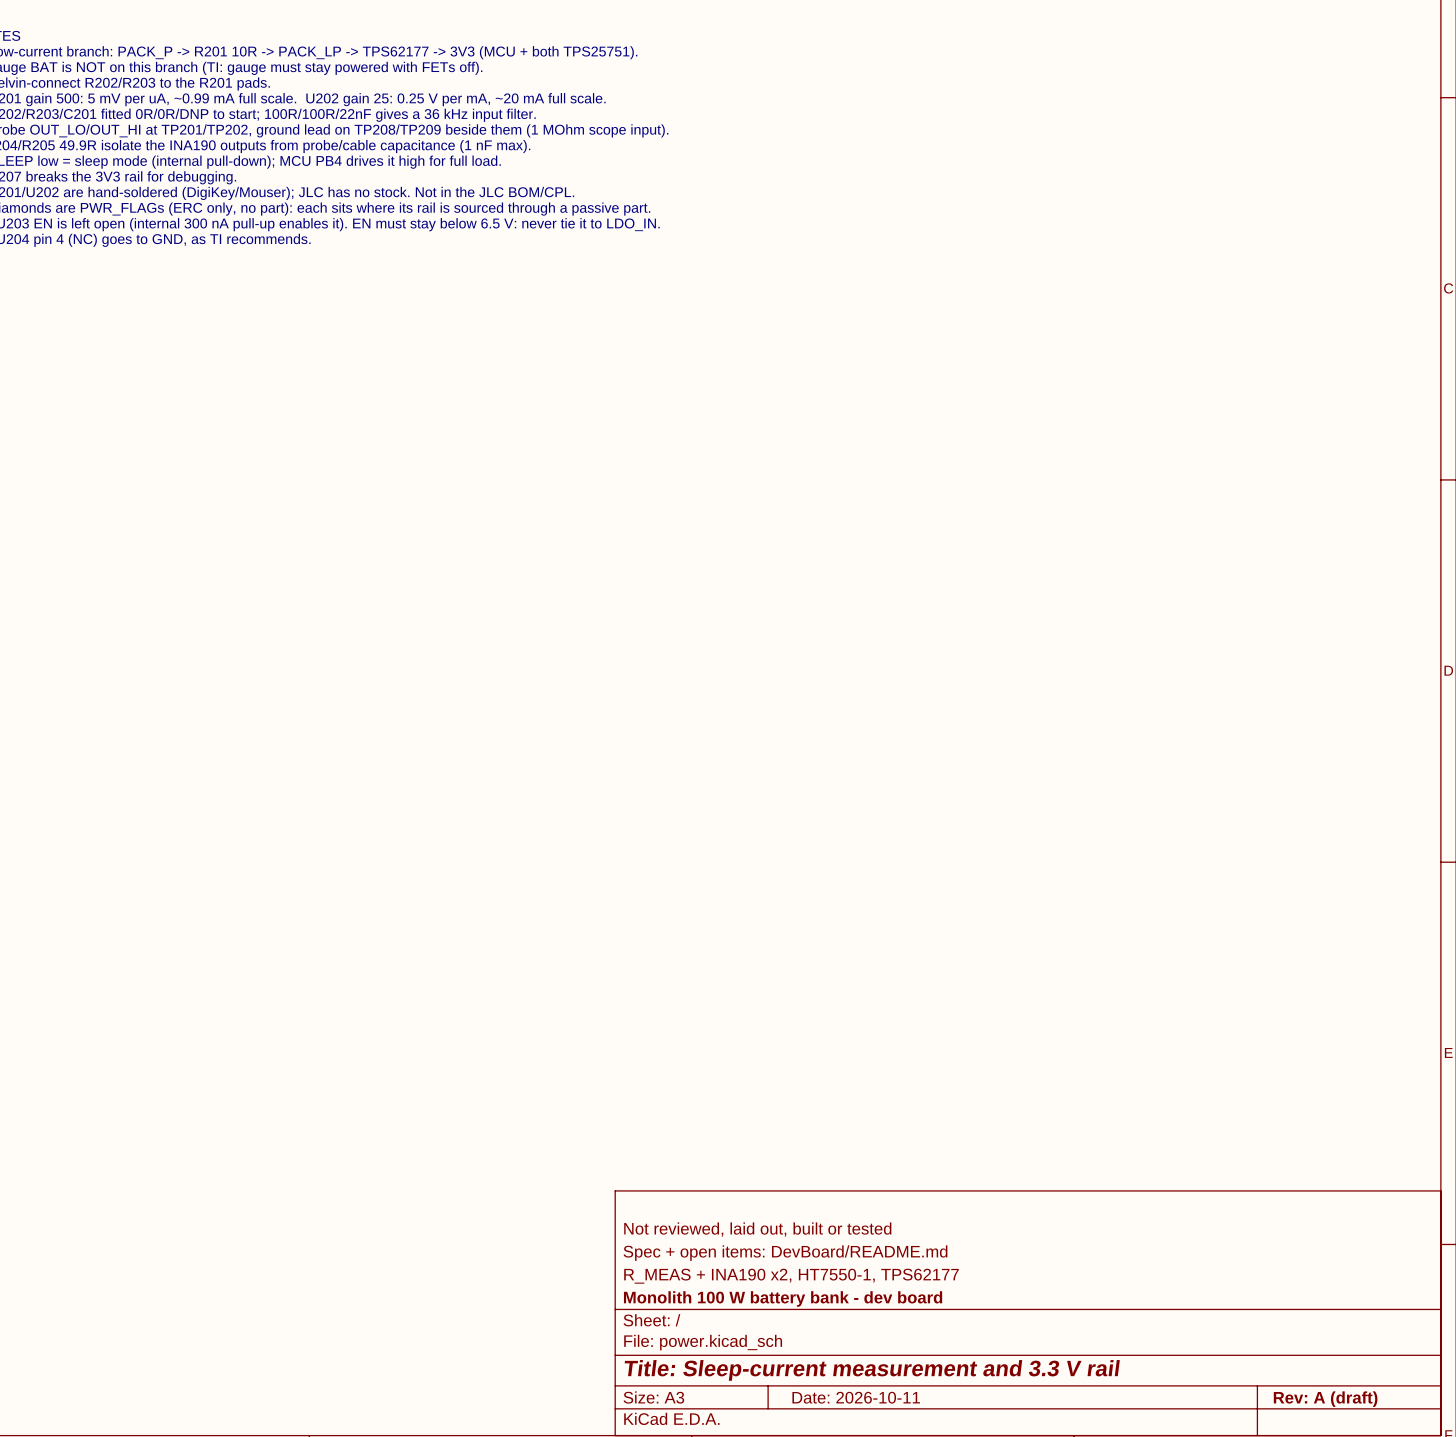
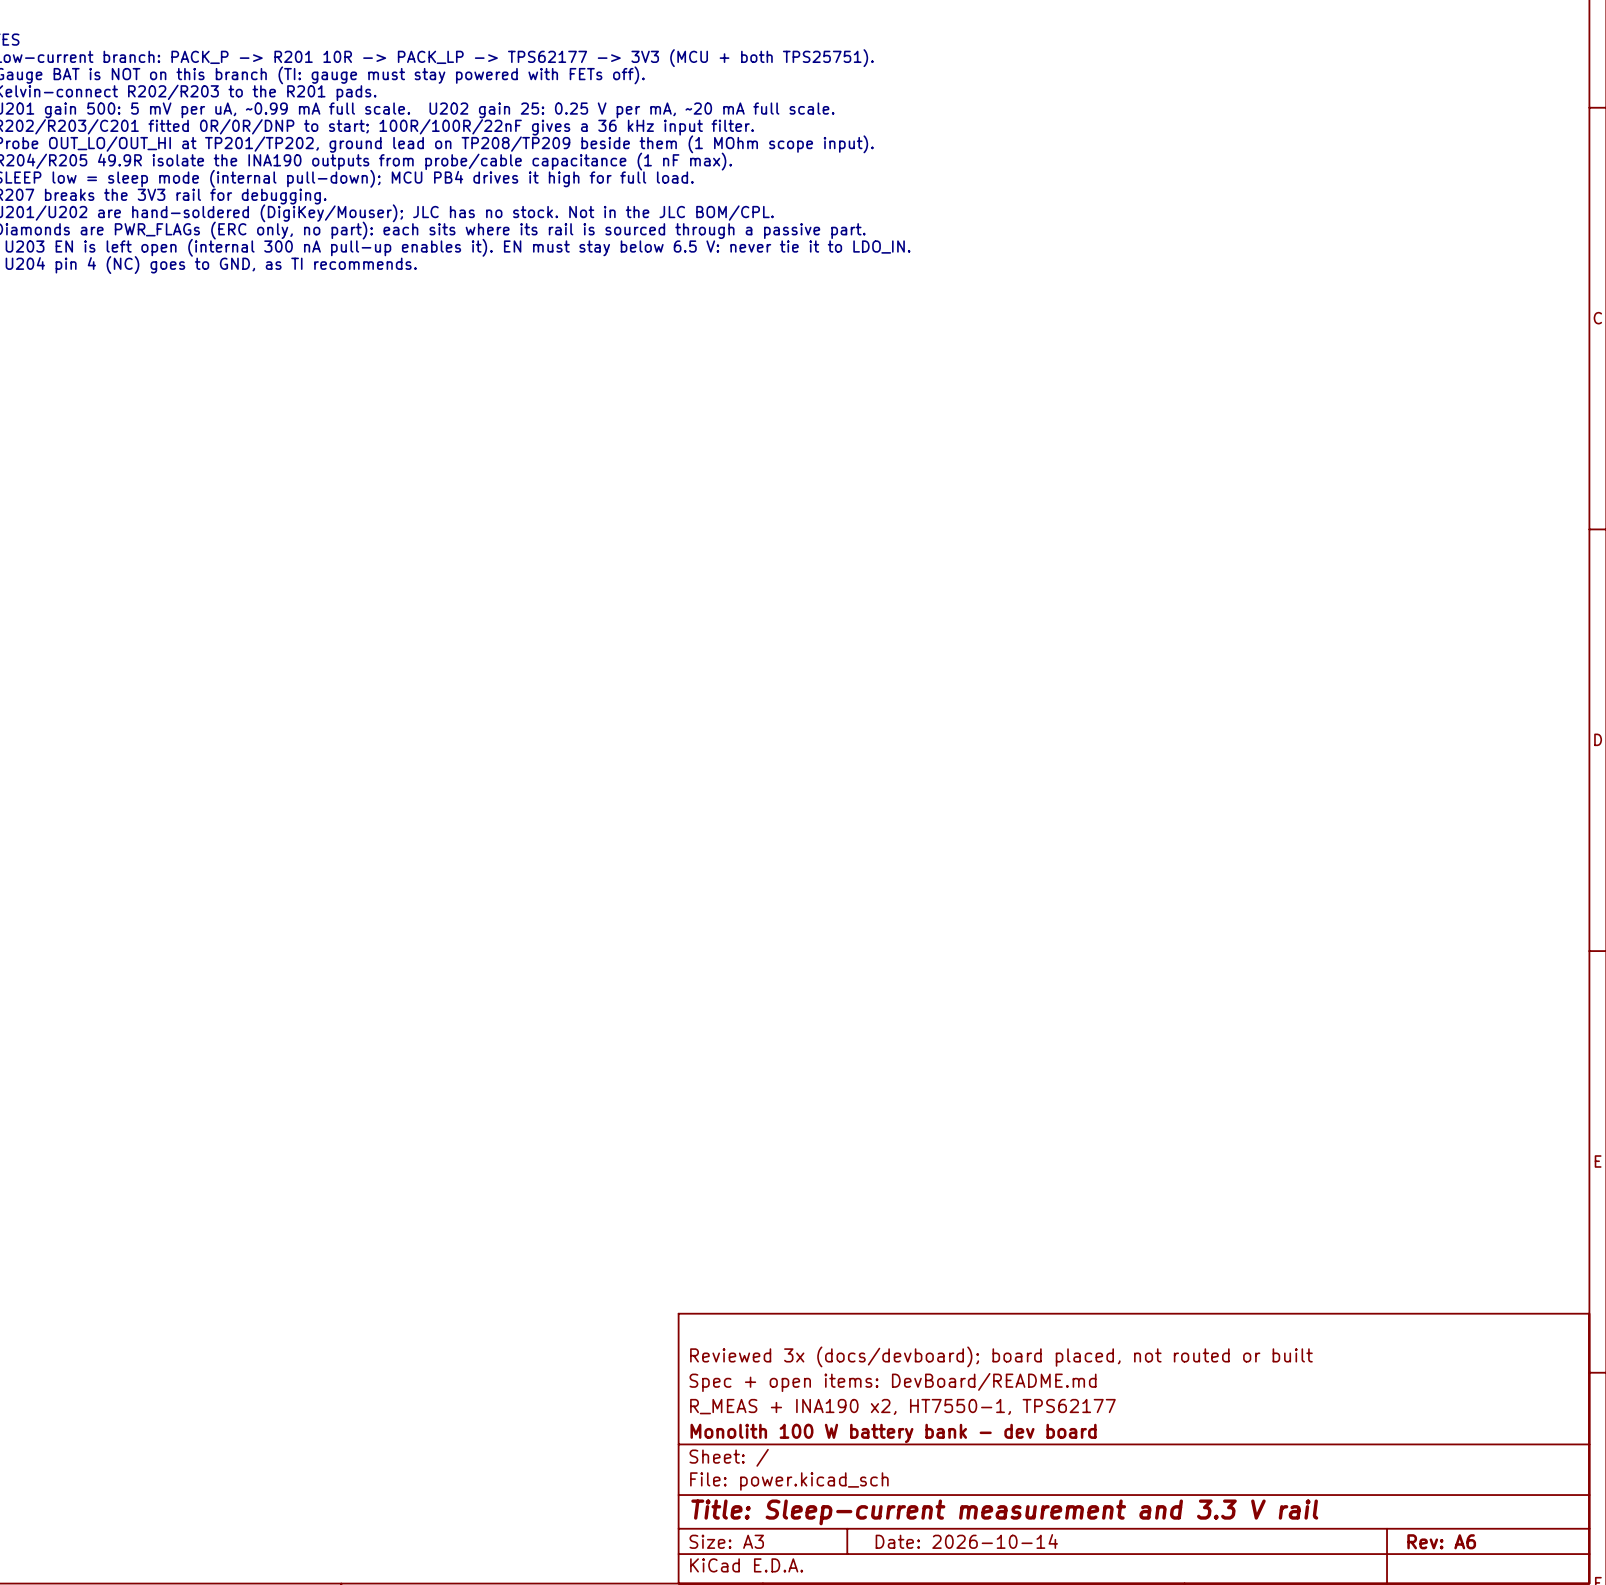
title block: Not reviewed, laid out, built or tested (757, 1229) -> Reviewed 3x (docs/devboard); board placed, not routed or built (1001, 1356)
title block: Date: 2026-10-11 (856, 1397) -> Date: 2026-10-14 (966, 1541)
title block: Rev: A (draft) (1325, 1399) -> Rev: A6 (1441, 1541)

